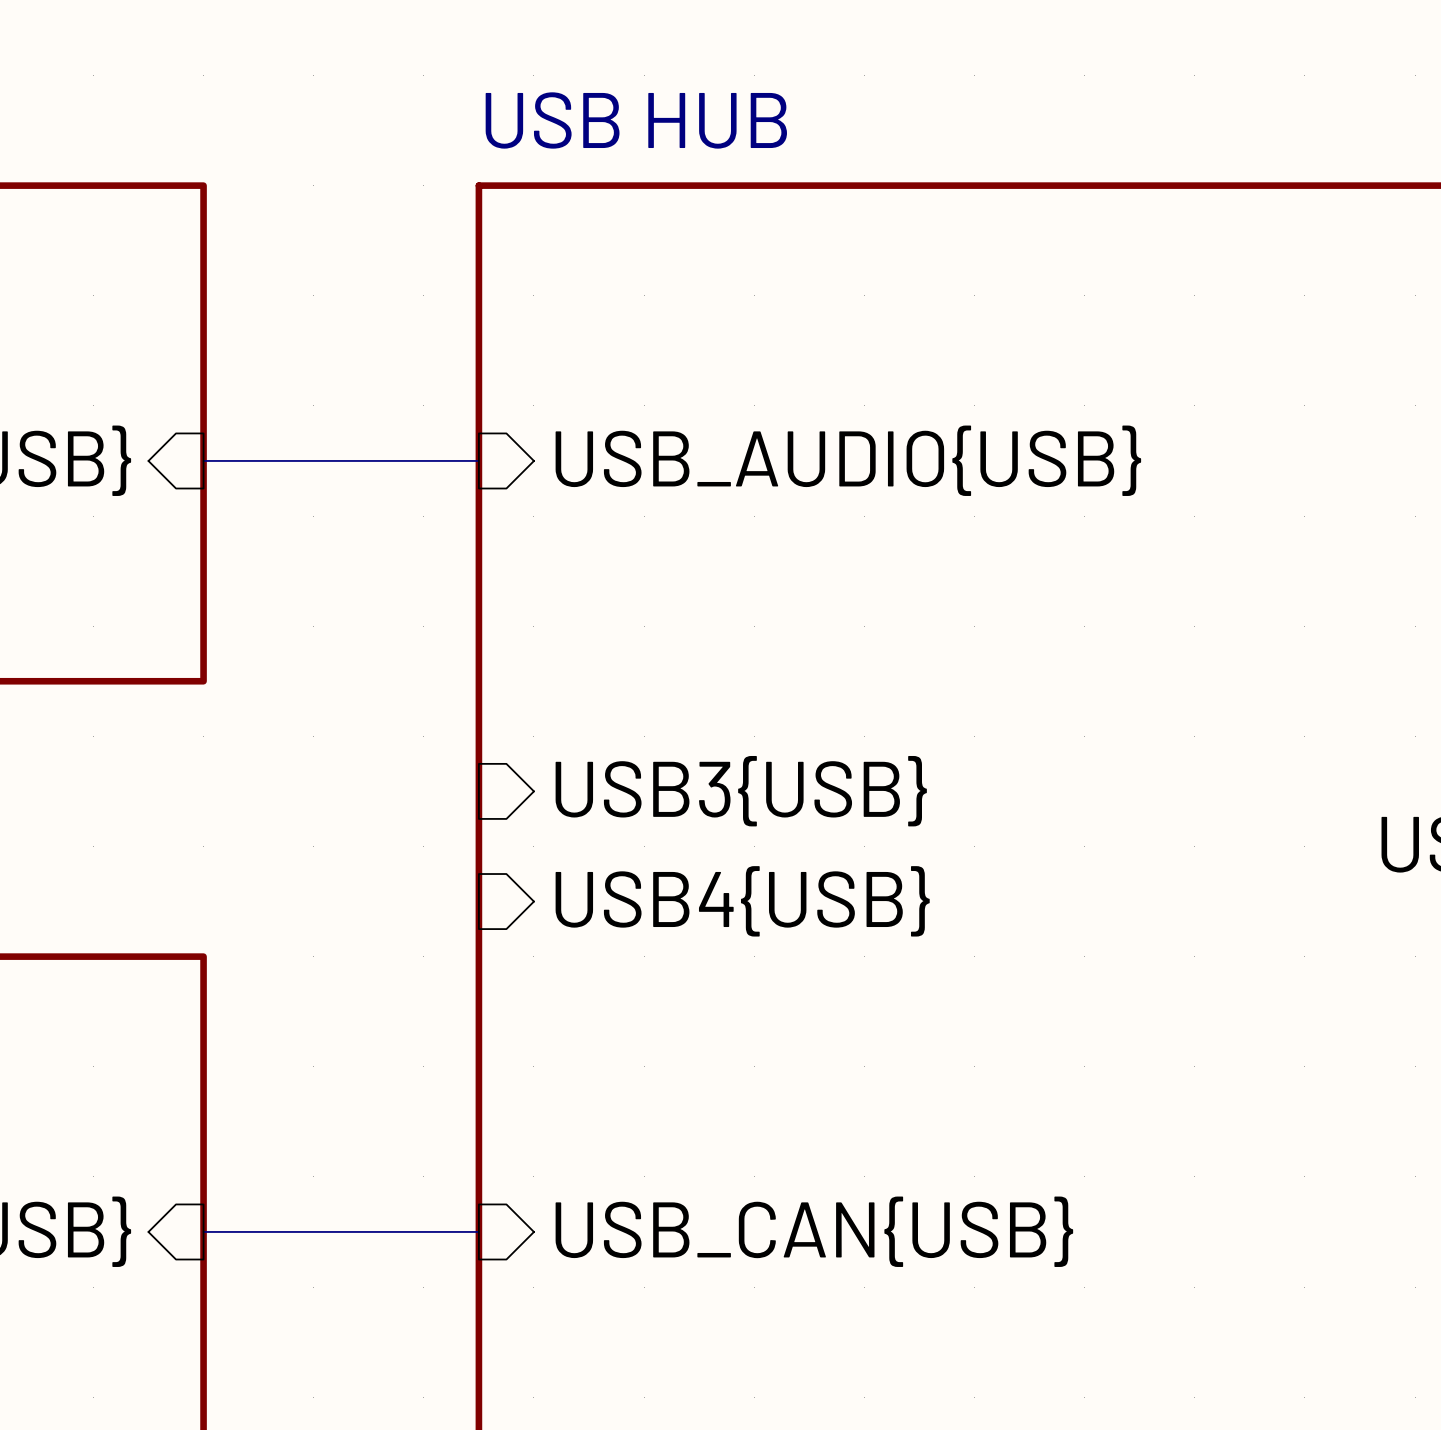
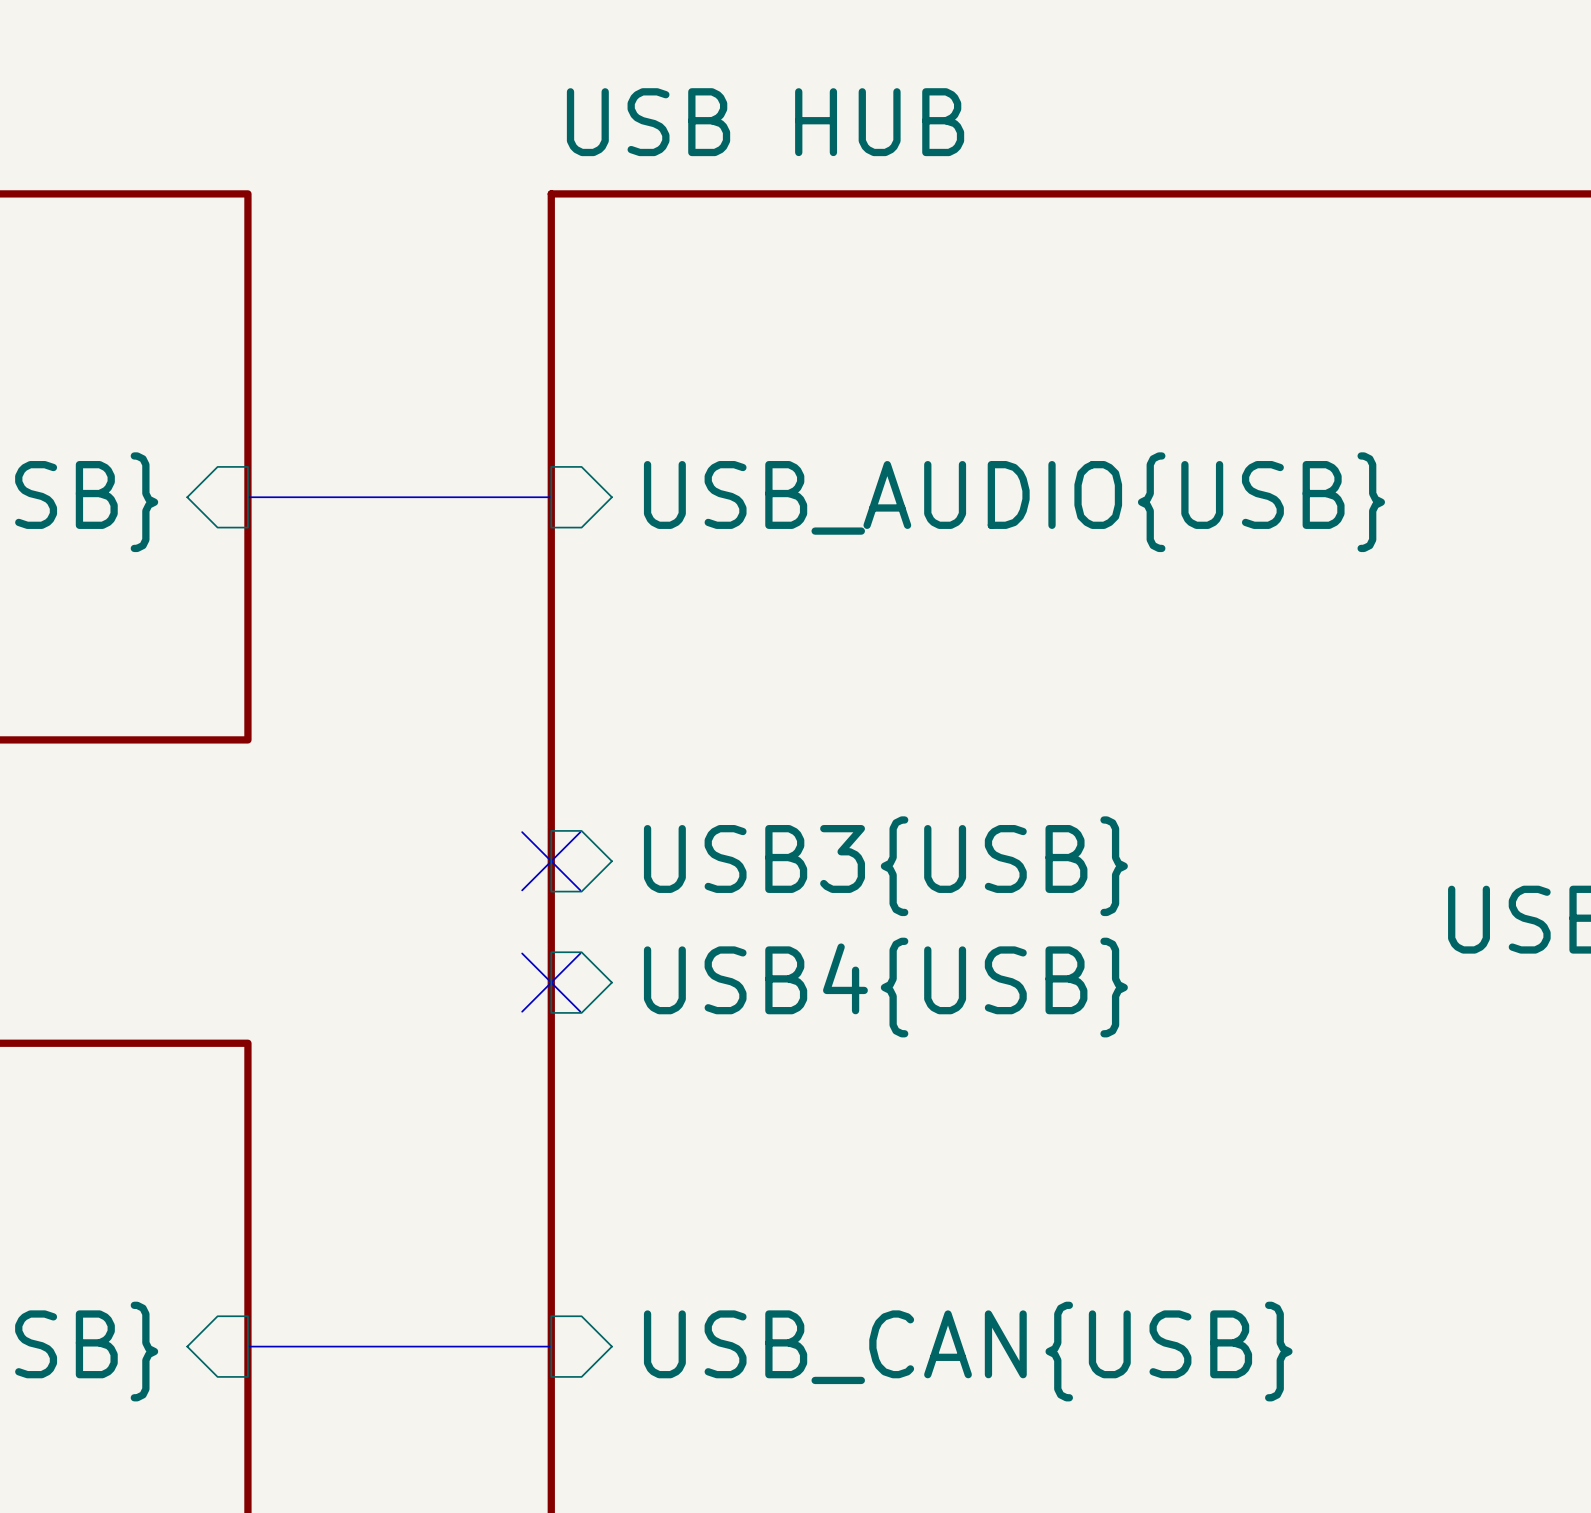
no-connect mark: none -> (551, 861)
no-connect mark: none -> (551, 982)

